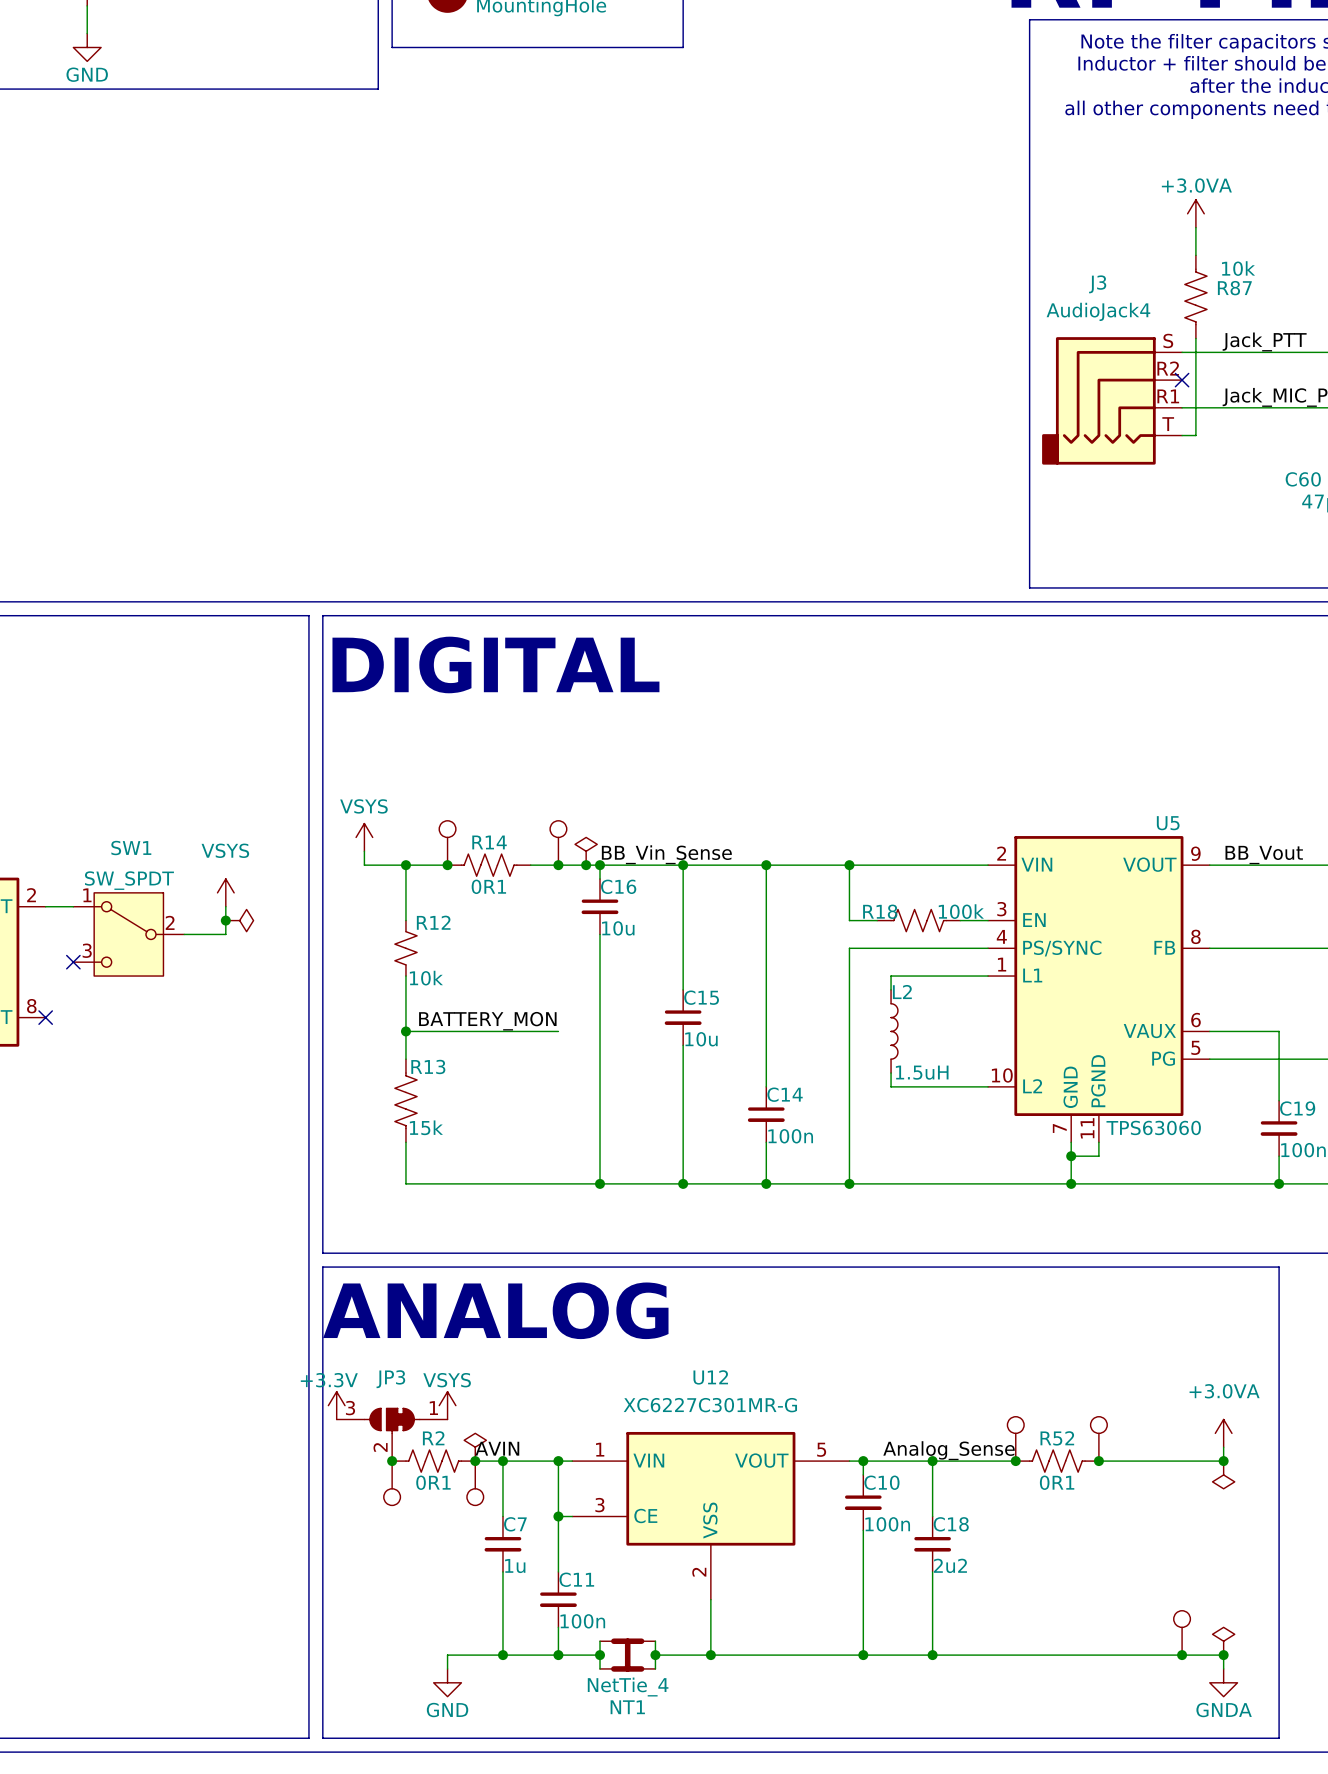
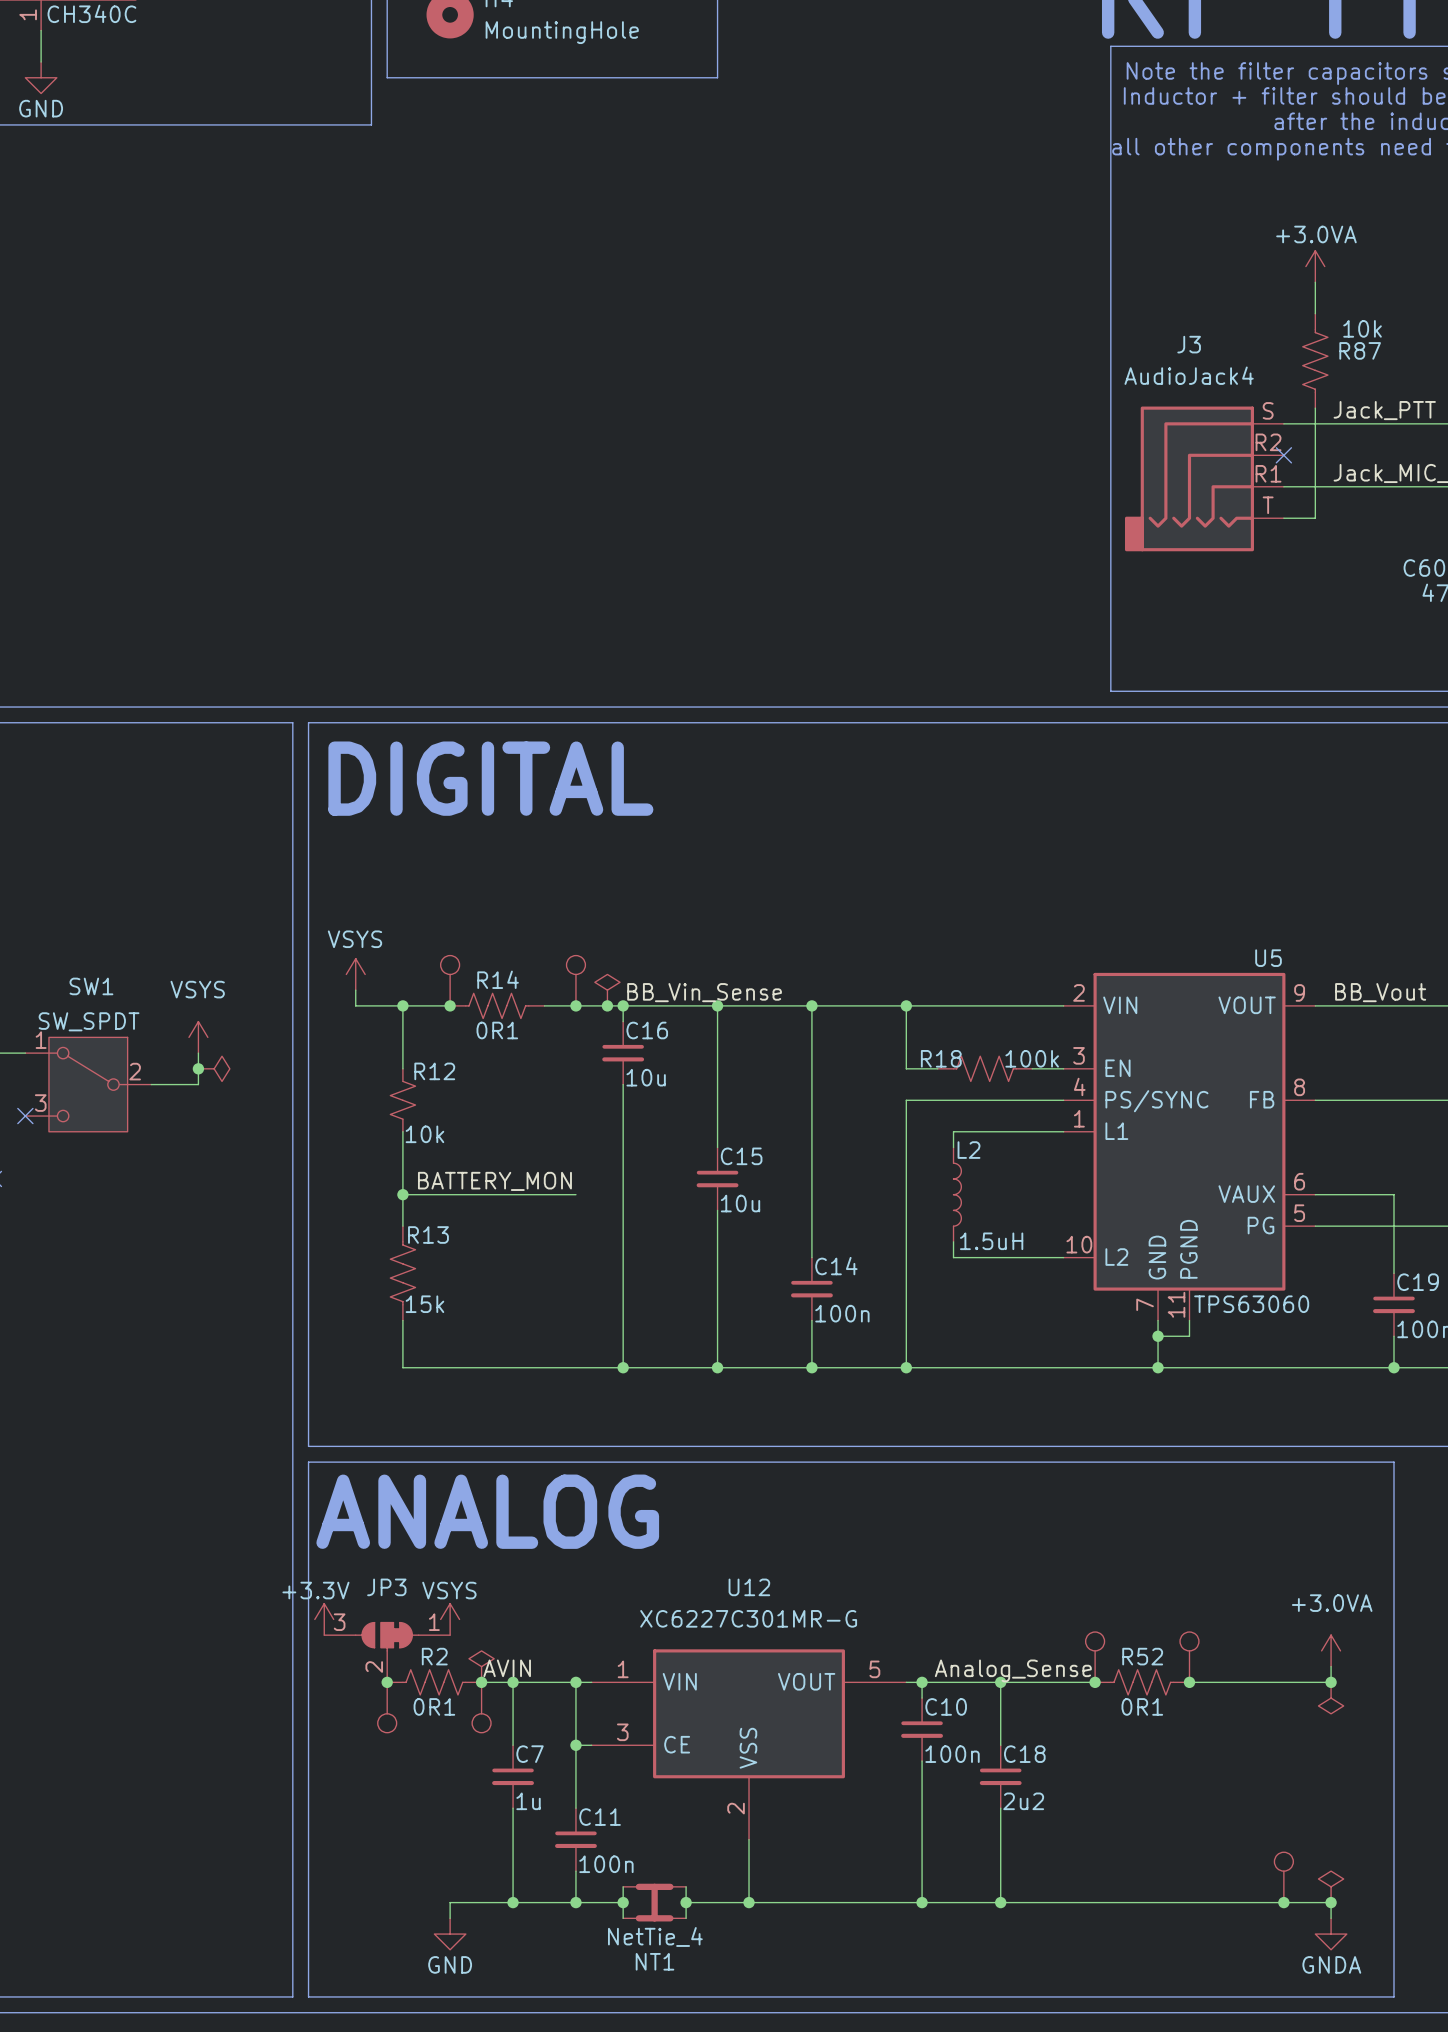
power symbol position: +3.0VA (1195, 213) -> +3.0VA (1315, 266)
wire: (1195, 227) (1195, 255) -> (1315, 282) (1315, 313)
R87 position: (1195, 296) -> (1315, 360)
wire: (1195, 338) (1195, 435) -> (1315, 408) (1315, 518) (1299, 518)

